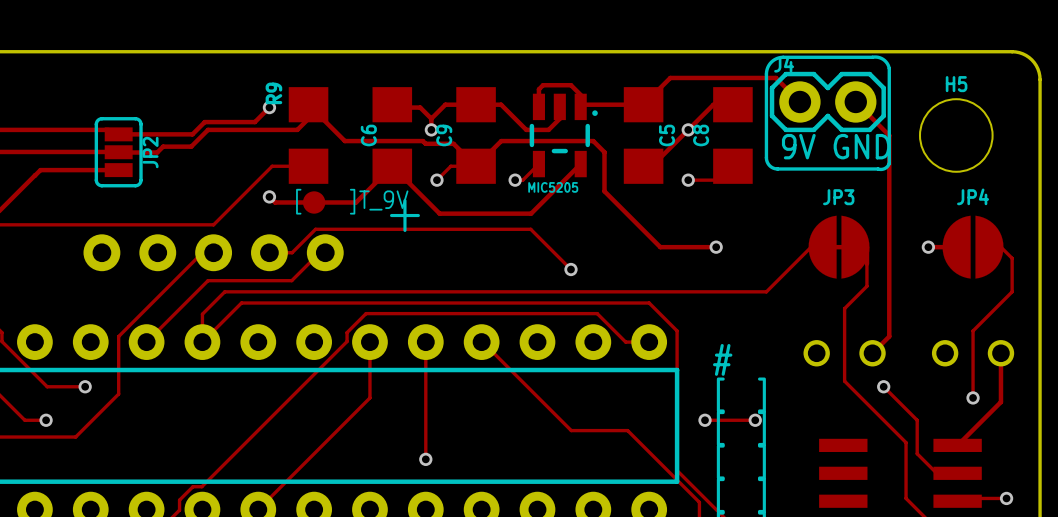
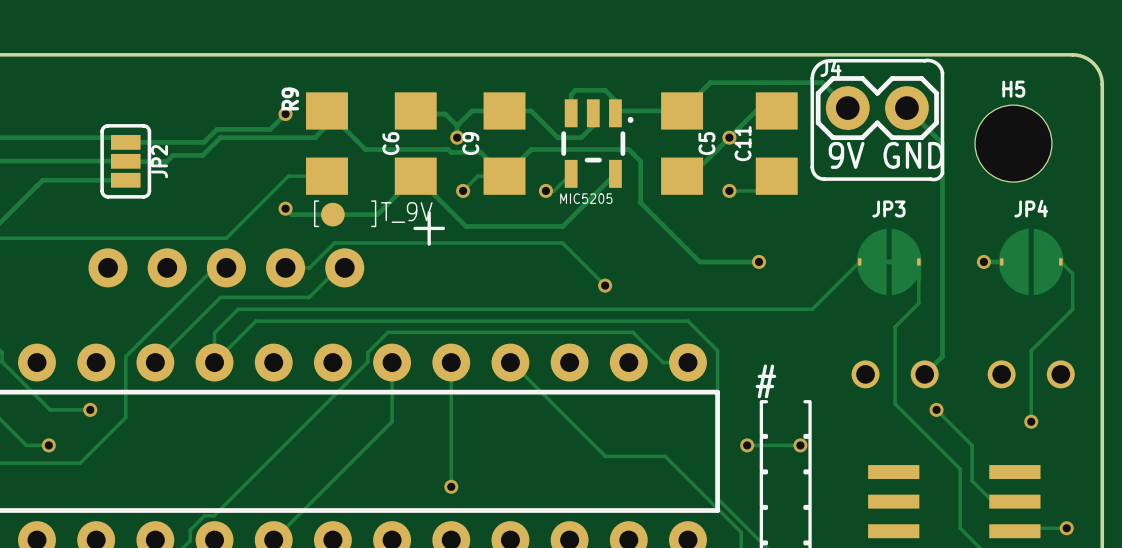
C8 name: C8 (701, 135) -> C11 (743, 143)
track: (1000, 353) (1000, 402) (957, 445) -> none

